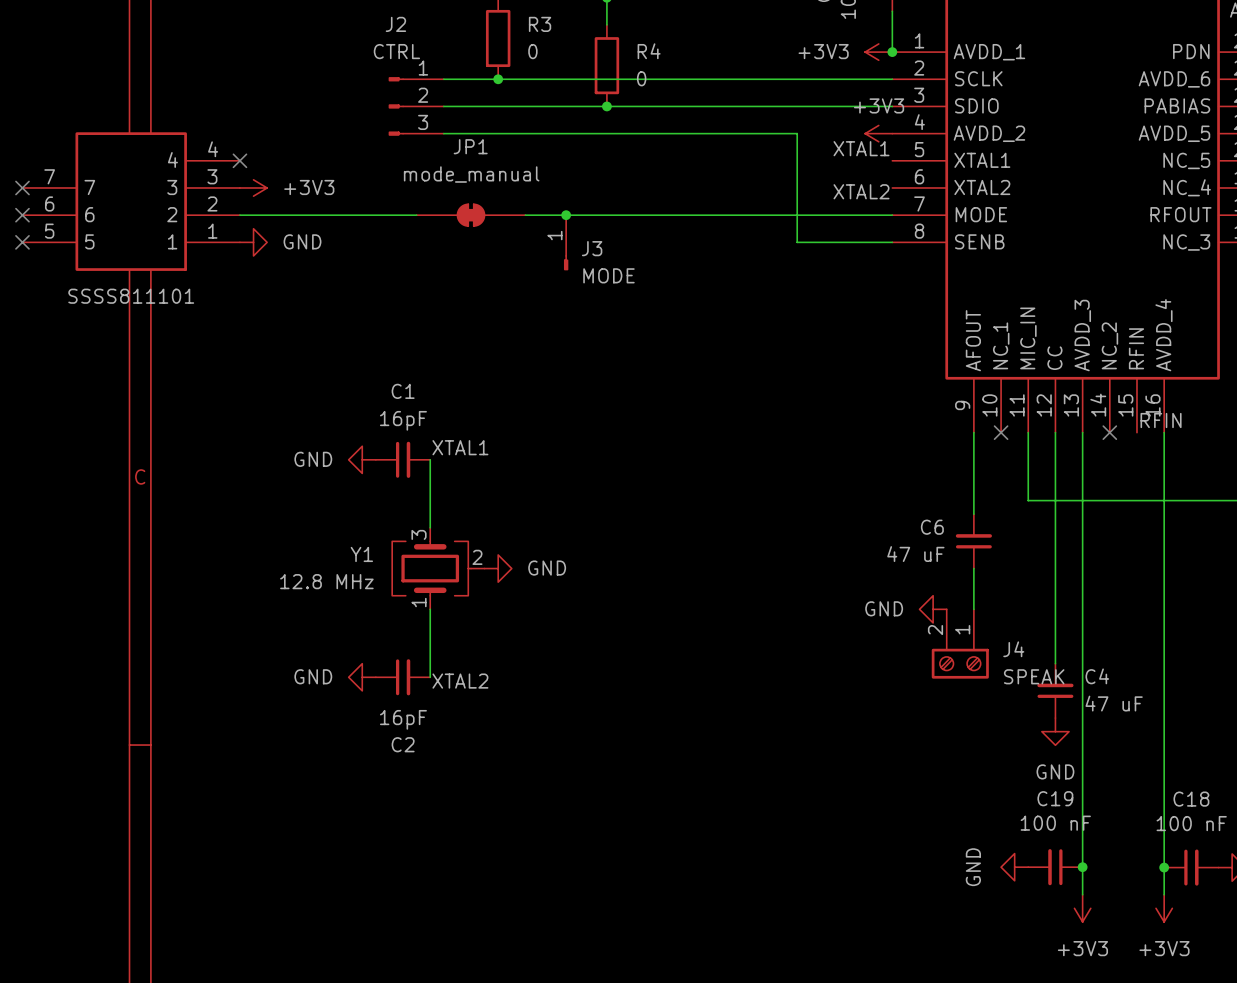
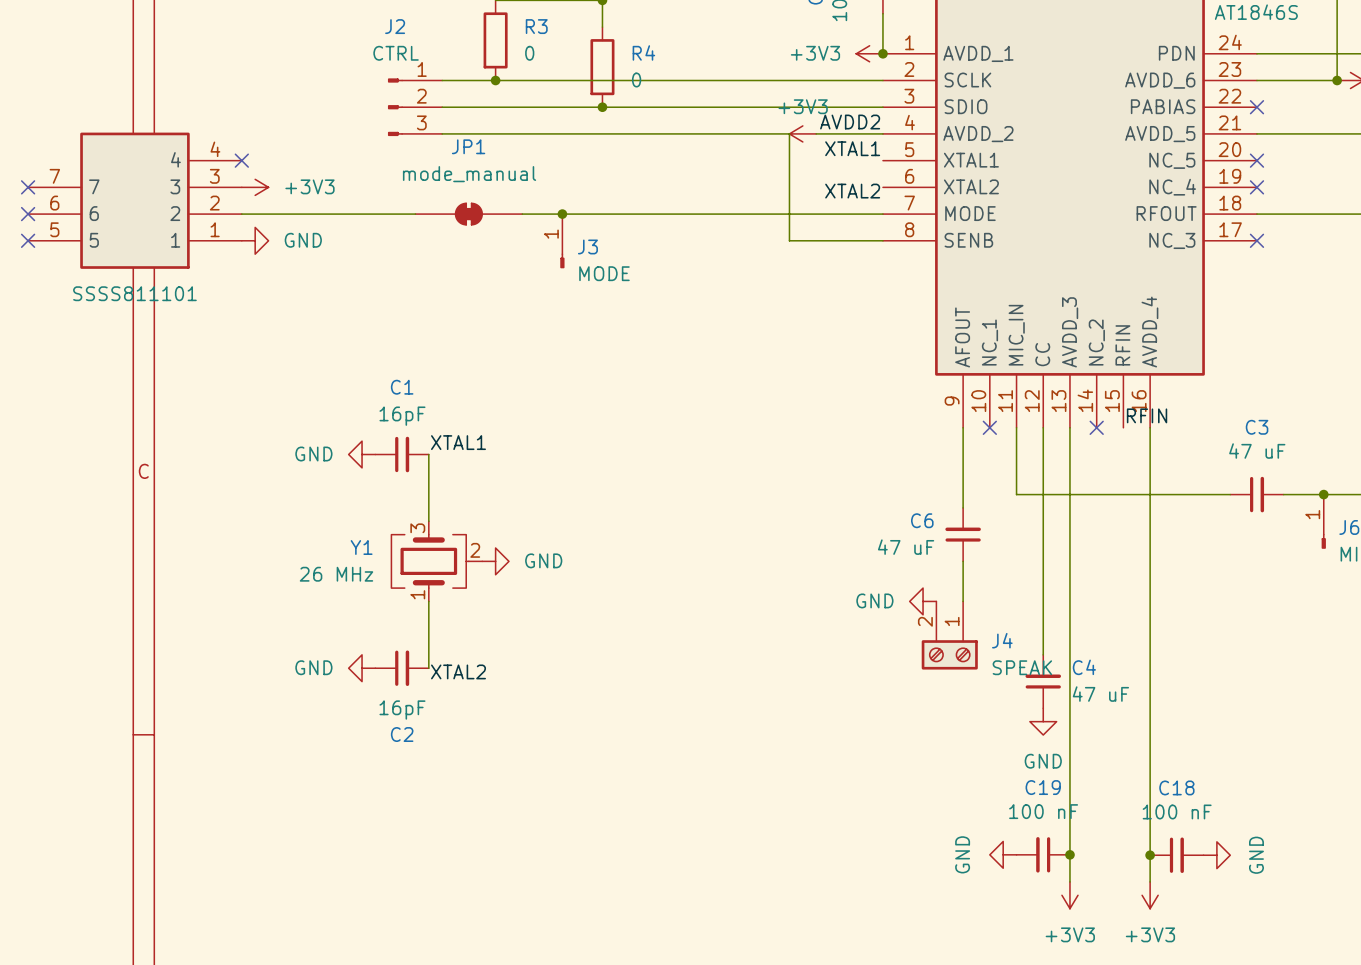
label: none -> AVDD2 (850, 122)
wire: none -> (816, 133) (882, 133)
power symbol position: +3V3 (878, 133) -> +3V3 (802, 133)
Y1 value: 12.8 MHz (326, 581) -> 26 MHz (336, 574)

